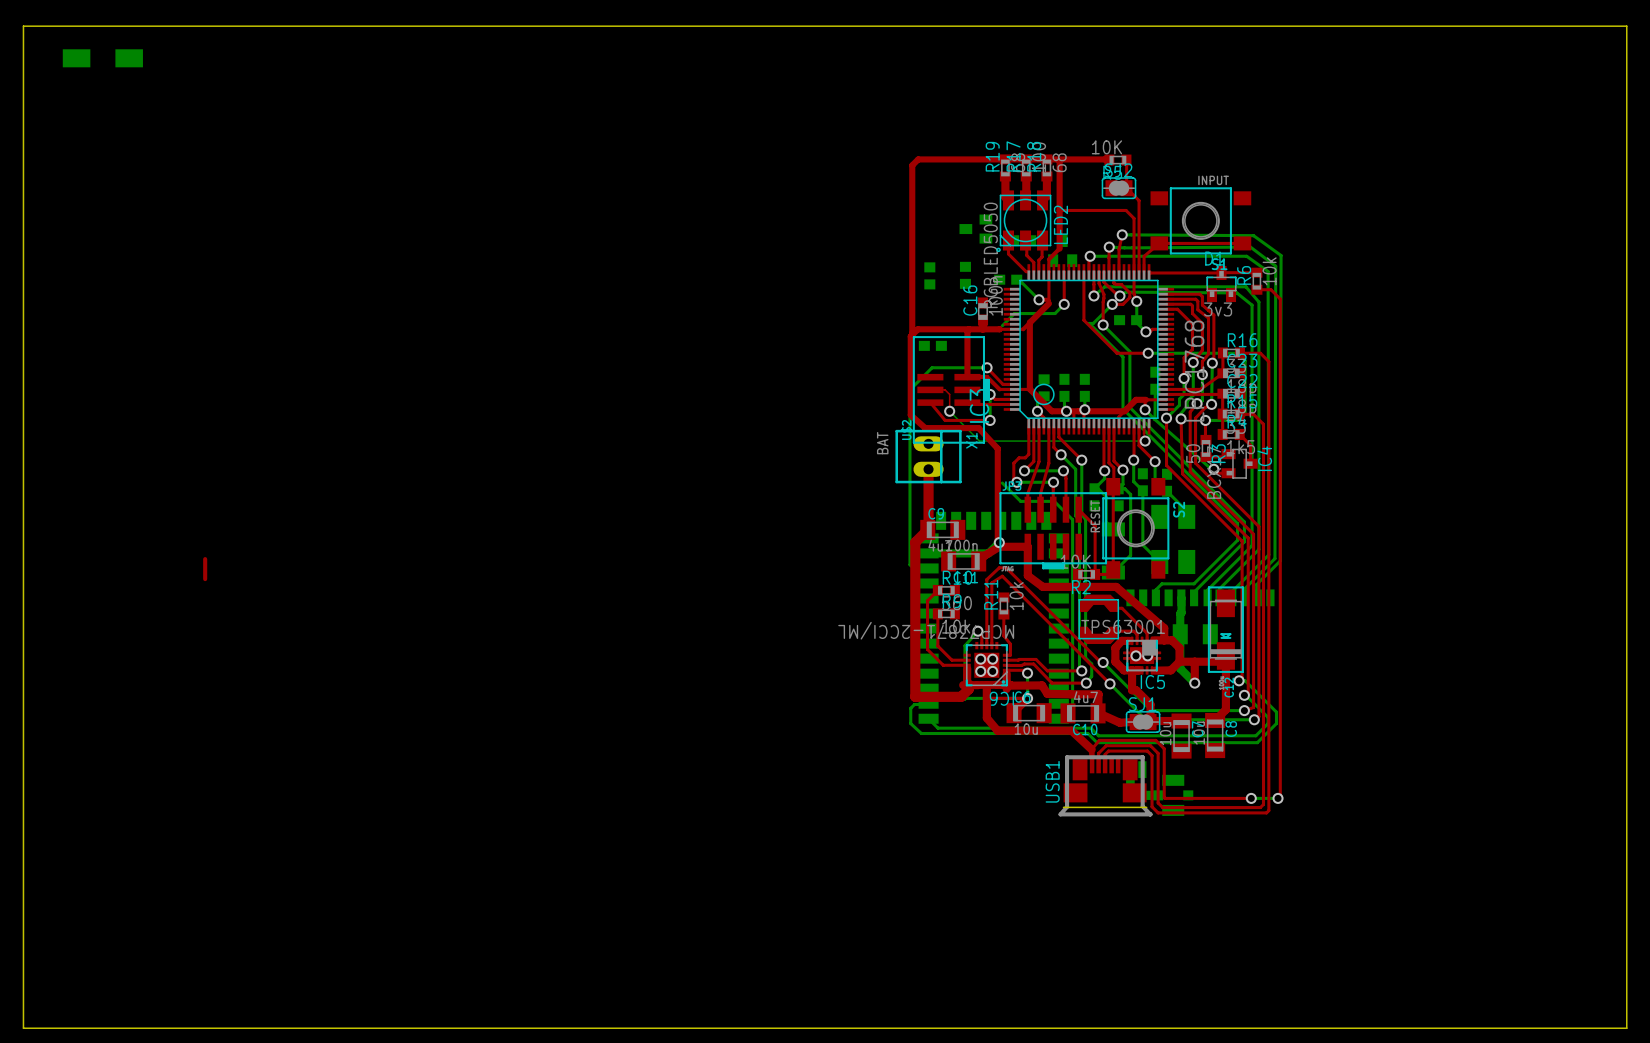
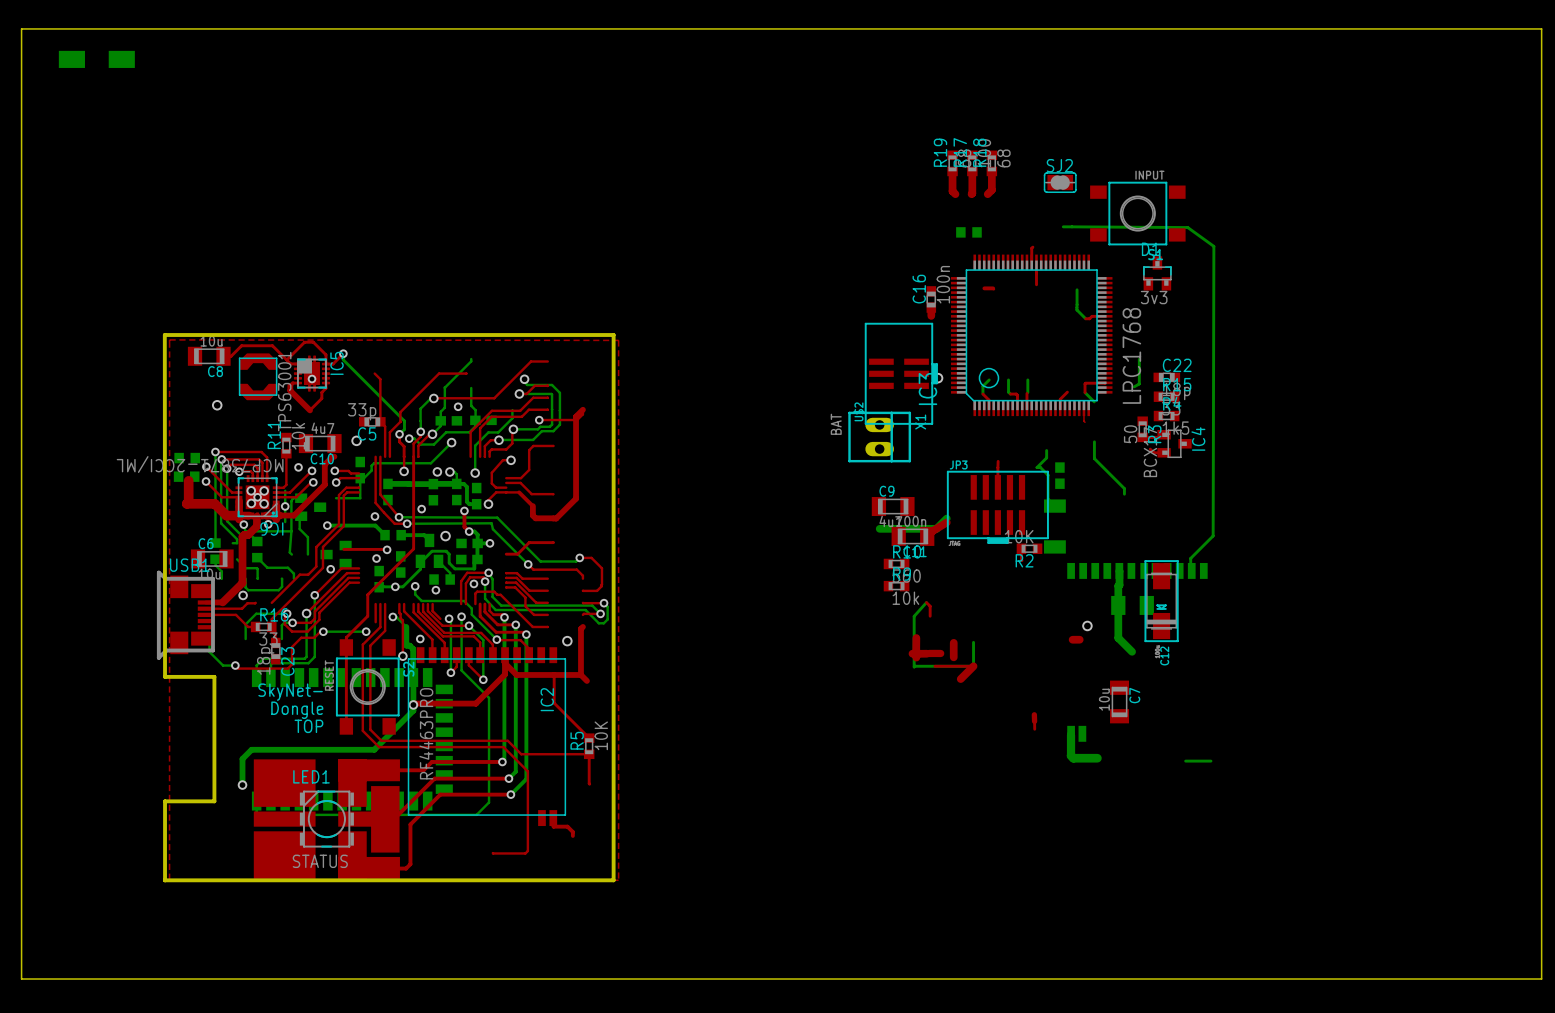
top track: (1059, 160) (1059, 248) (1048, 259) (1048, 271) -> none
top track: (1109, 160) (918, 159) (912, 165) (913, 334) -> none
R5 rotation: 0° (1117, 160) -> 90° clockwise (589, 746)
R5 position: (1117, 160) -> (589, 746)
top track: (1126, 160) (1126, 188) (1139, 200) (1139, 271) -> none
top track: (1059, 210) (1126, 210) (1134, 218) (1134, 294) (1136, 301) -> none
LED2: RGBLED5050 (1023, 221) -> none
part: (975, 229) -> none
top track: (1122, 234) (1119, 249) (1119, 271) -> none
via: (1122, 234) -> none
top track: (1008, 240) (1008, 253) (1026, 271) (1028, 271) -> none
top track: (1025, 240) (1026, 255) (1033, 262) (1033, 271) -> none
top track: (1042, 240) (1038, 271) -> none
top track: (1242, 243) (1159, 243) (1144, 256) (1144, 271) -> none
bottom track: (1109, 247) (1250, 247) (1275, 266) (1274, 558) (1244, 588) (1245, 597) -> none
top track: (1109, 247) (1108, 271) -> none
via: (1109, 247) -> none
part: (1062, 250) -> none
bottom track: (1090, 256) (1246, 256) (1268, 271) (1268, 554) (1232, 591) (1232, 597) -> none
via: (1090, 256) -> none
top track: (1048, 271) (1048, 303) (1029, 322) (1029, 389) -> none
top track: (1063, 271) (1064, 304) -> none
top track: (1083, 271) (1083, 320) (1116, 353) (1148, 353) -> none
top track: (1099, 271) (1099, 283) (1103, 294) (1103, 324) -> none
top track: (1103, 271) (1103, 282) (1119, 295) -> none
top track: (1113, 271) (1113, 282) (1121, 284) (1129, 292) (1129, 297) (1123, 304) (1112, 304) -> none
top track: (1149, 271) (1256, 272) -> none
part: (929, 275) -> none
part: (965, 275) -> none
part: (1008, 279) -> none
bottom track: (1016, 279) (1039, 299) -> none
R6: 10k (1256, 281) -> none
top track: (1256, 289) (1271, 289) (1280, 299) (1280, 796) (1278, 798) -> none
top track: (1166, 294) (1199, 294) (1202, 296) (1202, 305) (1213, 315) (1212, 363) -> none
bottom track: (1093, 295) (1104, 286) (1245, 286) (1258, 302) (1258, 549) (1219, 588) (1219, 597) -> none
via: (1093, 295) -> none
bottom track: (1119, 295) (1126, 292) (1236, 292) (1252, 305) (1252, 545) (1207, 590) (1207, 597) -> none
via: (1119, 295) -> none
via: (1039, 299) -> none
top track: (1166, 299) (1195, 299) (1197, 301) (1197, 309) (1208, 318) (1208, 354) (1202, 361) (1202, 374) -> none
via: (1136, 301) -> none
bottom track: (1064, 304) (1055, 313) (1014, 313) (1002, 325) -> none
via: (1064, 304) -> none
bottom track: (1112, 304) (1093, 323) (1089, 323) (1123, 357) (1123, 408) (1237, 523) (1237, 540) (1194, 583) (1161, 583) (1155, 589) (1155, 597) -> none
via: (1112, 304) -> none
top track: (1166, 304) (1190, 304) (1192, 313) (1202, 323) (1202, 350) (1193, 362) -> none
top track: (1166, 309) (1177, 309) (1192, 324) (1192, 349) (1184, 357) (1184, 378) -> none
part: (1128, 320) -> none
top track: (1030, 322) (1023, 329) (917, 329) (910, 336) (910, 415) (925, 428) (978, 428) (997, 448) (997, 541) (999, 546) (1027, 546) (1027, 575) (1042, 586) (1116, 586) (1164, 628) (1164, 640) -> none
bottom track: (1103, 324) (1129, 351) (1129, 407) (1244, 521) (1244, 541) (1194, 592) (1194, 597) -> none
via: (1103, 324) -> none
top track: (968, 329) (967, 377) (987, 376) (999, 389) (1029, 389) -> none
via: (1145, 331) -> none
part: (932, 345) -> none
top track: (1222, 352) (1222, 373) (1200, 389) (1166, 389) -> none
R16 position: (1231, 352) -> (263, 626)
top track: (1239, 352) (1260, 353) (1268, 361) (1268, 810) (1266, 812) (1158, 812) (1152, 806) (1152, 755) (1147, 751) (1108, 751) (1105, 754) (1105, 764) -> none
bottom track: (1148, 353) (1239, 353) (1245, 360) (1245, 414) (1239, 420) (1205, 420) -> none
via: (1148, 353) -> none
top zone outline: none -> (169, 339) (618, 340) (618, 880) (169, 879) (169, 339)
bottom track: (1193, 362) (1193, 395) (1187, 401) (1187, 405) (1181, 413) (1181, 418) -> none
via: (1193, 362) -> none
bottom track: (1212, 363) (1211, 404) -> none
via: (1212, 363) -> none
bottom track: (987, 367) (932, 367) (909, 389) (909, 564) (913, 568) (928, 568) -> none
top track: (987, 367) (1002, 384) (1011, 384) -> none
via: (987, 367) -> none
bottom track: none -> (343, 353) (343, 359) (404, 421) (404, 429) (399, 434)
top track: none -> (343, 353) (333, 364) (325, 364) (325, 354) (313, 342) (304, 342) (286, 360)
via: none -> (343, 353)
top track: none -> (223, 356) (231, 356) (241, 345) (272, 345) (290, 363) (297, 364)
C23 rotation: 0° (1231, 373) -> 90° clockwise (275, 651)
C23 position: (1231, 373) -> (275, 651)
bottom track: none -> (471, 359) (471, 361) (444, 387) (444, 407) (440, 411) (440, 426) (432, 434)
via: (1202, 374) -> none
top track: none -> (547, 361) (531, 361) (494, 398) (433, 398)
bottom track: (1184, 378) (1184, 394) (1179, 399) (1179, 405) (1166, 418) -> none
via: (1184, 378) -> none
part: (1155, 380) -> none
part: (1044, 387) -> none
part: (1064, 387) -> none
part: (1084, 387) -> none
top track: none -> (374, 373) (380, 379) (380, 421) (385, 426) (385, 456)
top track: none -> (466, 373) (439, 373) (400, 412) (400, 421) (389, 432) (389, 456)
top track: (930, 389) (945, 389) (949, 394) (949, 411) -> none
top track: (1029, 389) (1052, 411) (1124, 411) (1135, 399) (1145, 399) -> none
bottom track: (1155, 389) (1154, 419) (1213, 469) -> none
part: none -> (258, 376)
top track: (1222, 393) (1166, 394) -> none
top track: (1222, 393) (1222, 434) -> none
bottom track: (990, 394) (990, 420) -> none
top track: (990, 394) (995, 399) (1011, 399) -> none
via: none -> (312, 379)
bottom track: none -> (524, 379) (527, 384) (552, 384) (559, 392) (559, 424) (553, 431) (541, 431) (533, 439) (498, 440)
via: none -> (524, 379)
top track: none -> (297, 383) (293, 383) (290, 385) (290, 390) (310, 410)
top track: none -> (326, 383) (326, 388) (321, 392) (321, 398) (310, 410)
top track: none -> (547, 385) (534, 385) (526, 393) (519, 393)
top track: (930, 402) (945, 420) (990, 420) -> none
top track: (967, 402) (969, 404) (1011, 404) -> none
top track: (1197, 403) (1190, 412) (1190, 471) (1253, 534) (1253, 707) (1244, 710) -> none
via: (1197, 403) -> none
bottom track: none -> (471, 388) (471, 405) (475, 410) (475, 426) (469, 432) (446, 432) (433, 444) (420, 444) (414, 438) (409, 438)
top track: (1211, 404) (1205, 407) (1195, 418) (1195, 463) (1258, 526) (1258, 716) (1254, 719) -> none
via: (1211, 404) -> none
via: (1084, 409) -> none
via: (1145, 409) -> none
bottom track: none -> (519, 393) (551, 393) (552, 424) (549, 426) (540, 426) (537, 429) (513, 429)
via: none -> (519, 393)
bottom track: (949, 411) (979, 441) (1145, 441) -> none
via: (949, 411) -> none
via: (1037, 411) -> none
via: (1066, 411) -> none
top track: (1239, 414) (1253, 414) (1263, 424) (1263, 804) (1260, 807) (1162, 807) (1158, 802) (1158, 753) (1150, 745) (1106, 745) (1098, 753) (1098, 764) -> none
bottom track: none -> (433, 398) (430, 398) (420, 408) (420, 431)
via: none -> (433, 398)
top track: none -> (547, 397) (533, 397) (520, 410) (491, 410) (470, 432) (470, 456)
top track: (1166, 418) (1166, 465) (1242, 541) (1242, 677) (1239, 680) -> none
via: (1166, 418) -> none
top track: (1181, 418) (1182, 473) (1248, 538) (1248, 693) (1244, 695) -> none
via: (1181, 418) -> none
via: (990, 420) -> none
top track: (1205, 420) (1205, 439) -> none
via: (1205, 420) -> none
via: none -> (217, 405)
via: none -> (458, 406)
top track: none -> (547, 409) (528, 409) (521, 416) (491, 416) (480, 428) (480, 456)
top track: (1028, 427) (1028, 454) (1025, 457) (1019, 457) (1013, 463) (1013, 479) (1016, 482) -> none
top track: (1033, 427) (1033, 461) (1024, 470) -> none
top track: (1038, 427) (1039, 461) (1027, 493) (1027, 509) -> none
top track: (1048, 427) (1048, 463) (1040, 493) (1040, 518) (1040, 509) -> none
top track: (1053, 427) (1053, 447) (1061, 454) -> none
top track: (1058, 427) (1058, 437) (1081, 460) -> none
top track: (1103, 427) (1104, 470) -> none
top track: (1108, 427) (1108, 462) (1113, 467) (1113, 486) (1113, 569) (1108, 574) (1095, 574) (1095, 526) (1078, 509) -> none
top track: (1113, 427) (1113, 461) (1123, 470) -> none
top track: (1134, 427) (1133, 460) -> none
top track: (1139, 427) (1139, 445) (1155, 461) -> none
bottom track: none -> (512, 410) (512, 418) (498, 432) (488, 432) (475, 445) (475, 473)
top track: (1239, 434) (1250, 445) (1250, 463) -> none
part: none -> (483, 420)
top track: none -> (539, 420) (577, 420) (582, 414) (582, 409) (576, 416) (576, 498) (556, 518) (553, 518)
via: none -> (539, 420)
part: none -> (448, 420)
C5: none -> 33p (372, 421)
via: (1145, 441) -> none
top track: none -> (513, 429) (512, 443) (506, 449) (491, 449) (489, 456)
via: none -> (513, 429)
top track: none -> (420, 431) (420, 436) (413, 443) (413, 548) (367, 594) (367, 616) (346, 637) (346, 726)
via: none -> (420, 431)
top track: none -> (399, 434) (399, 441) (404, 446) (404, 471)
via: none -> (399, 434)
top track: none -> (432, 434) (429, 434) (418, 445) (418, 456)
via: none -> (432, 434)
bottom track: (1061, 454) (1075, 469) (1075, 515) (1079, 521) (1079, 670) (1081, 670) -> none
via: (1061, 454) -> none
via: none -> (409, 438)
top track: none -> (498, 440) (490, 440) (484, 446) (484, 456)
via: none -> (498, 440)
via: none -> (356, 440)
bottom track: (1081, 460) (1081, 514) (1085, 519) (1085, 657) (1091, 664) (1091, 676) (1086, 683) -> none
via: (1081, 460) -> none
bottom track: (1133, 460) (1133, 481) (1142, 490) (1142, 545) (1159, 561) -> none
via: (1133, 460) -> none
via: (1155, 461) -> none
bottom track: none -> (451, 442) (430, 463) (374, 463) (371, 465) (371, 470) (364, 478) (360, 478) (360, 498) (336, 498)
via: none -> (451, 442)
top track: none -> (553, 445) (533, 445) (529, 450) (529, 469) (520, 478) (506, 478)
top track: (928, 469) (928, 529) (915, 542) (915, 696) (961, 696) (968, 689) (968, 684) -> none
via: (1213, 469) -> none
bottom track: (1024, 470) (1063, 470) -> none
via: (1024, 470) -> none
top track: (1063, 470) (1065, 473) (1065, 509) -> none
via: (1063, 470) -> none
via: (1104, 470) -> none
bottom track: (1123, 470) (1123, 484) (1118, 488) (1124, 488) (1130, 494) (1130, 555) (1113, 572) -> none
via: (1123, 470) -> none
bottom track: none -> (215, 451) (215, 543)
top track: none -> (215, 451) (261, 451) (267, 457) (267, 478)
via: none -> (215, 451)
top track: none -> (286, 453) (286, 484) (283, 487) (276, 487)
top track: none -> (334, 456) (324, 464) (324, 484) (294, 515) (265, 515)
top track: none -> (375, 456) (375, 502) (394, 523) (407, 523)
top track: none -> (380, 456) (380, 494) (399, 517)
part: none -> (187, 458)
bottom track: none -> (221, 459) (221, 523) (237, 539) (237, 543) (232, 543)
top track: none -> (221, 459) (258, 459) (262, 462) (262, 478)
via: none -> (221, 459)
top track: none -> (511, 460) (502, 460) (491, 472) (491, 483) (496, 487) (506, 487)
via: none -> (511, 460)
bottom track: (1016, 482) (1053, 482) -> none
via: (1016, 482) -> none
via: (1053, 482) -> none
part: (1142, 482) -> none
part: (1167, 482) -> none
bottom track: (1002, 483) (1020, 501) (1054, 501) (1072, 519) (1072, 717) (1058, 718) -> none
top track: none -> (206, 466) (232, 492) (238, 492)
via: none -> (206, 466)
via: none -> (298, 467)
bottom track: none -> (227, 468) (227, 521) (240, 534) (250, 534) (257, 541)
top track: none -> (227, 468) (230, 464) (254, 464) (257, 468) (257, 478)
via: none -> (227, 468)
part: none -> (360, 470)
top track: none -> (312, 470) (289, 492) (276, 492)
via: none -> (312, 470)
top track: none -> (334, 470) (359, 473)
via: none -> (334, 470)
via: none -> (404, 471)
top track: none -> (239, 471) (250, 471) (252, 478)
via: none -> (239, 471)
via: none -> (437, 471)
bottom track: none -> (449, 471) (456, 474) (456, 483) (387, 483)
via: none -> (449, 471)
via: none -> (475, 473)
part: (1094, 497) -> none
part: none -> (186, 476)
top track: none -> (358, 478) (340, 478) (336, 482)
top track: none -> (188, 480) (188, 501) (186, 503) (214, 503) (226, 515) (249, 515)
top track: none -> (206, 481) (221, 497) (238, 497)
via: none -> (206, 481)
top track: none -> (313, 482) (296, 497) (276, 497)
via: none -> (313, 482)
via: none -> (336, 482)
top track: none -> (506, 482) (520, 482) (531, 494) (553, 494)
bottom track: none -> (456, 483) (463, 483) (466, 487) (466, 501) (469, 504) (476, 504)
top track: none -> (358, 487) (346, 487) (338, 495) (338, 524) (316, 547) (316, 566) (308, 574) (299, 574) (271, 602)
via: none -> (251, 490)
via: none -> (264, 490)
bottom track: none -> (285, 490) (285, 522)
part: none -> (387, 491)
part: none -> (433, 492)
part: none -> (456, 491)
top track: none -> (506, 492) (496, 492) (488, 500) (488, 504)
top track: none -> (359, 492) (347, 492) (343, 495) (343, 526) (322, 546) (322, 567) (271, 619) (271, 631) (275, 634) (275, 643)
top track: none -> (506, 492) (519, 492) (532, 506) (532, 515) (535, 518) (553, 518)
part: none -> (476, 496)
via: none -> (257, 497)
bottom track: none -> (301, 498) (292, 498) (291, 501) (291, 531)
top track: none -> (239, 500) (239, 519)
via: none -> (251, 503)
via: none -> (264, 503)
via: none -> (488, 504)
top track: none -> (276, 505) (276, 519)
S2 position: (1135, 528) -> (367, 686)
via: none -> (285, 506)
part: none -> (310, 507)
via: none -> (421, 509)
top track: none -> (464, 510) (464, 526) (469, 531)
via: none -> (464, 510)
top track: none -> (257, 515) (256, 526) (248, 534) (242, 536) (242, 583) (222, 602) (205, 602)
part: (1173, 539) -> none
bottom track: none -> (301, 516) (299, 529) (307, 537) (307, 554)
via: none -> (374, 516)
bottom track: none -> (399, 517) (497, 517) (540, 561) (576, 561) (579, 557)
via: none -> (399, 517)
via: (999, 542) -> none
bottom track: none -> (243, 524) (245, 531) (291, 531)
via: none -> (243, 524)
via: none -> (268, 524)
bottom track: none -> (407, 523) (491, 523) (492, 529) (528, 564)
via: none -> (407, 523)
bottom track: none -> (327, 525) (375, 525) (385, 535)
via: none -> (327, 525)
bottom track: none -> (291, 531) (289, 552) (291, 554)
bottom track: none -> (469, 531) (474, 531) (477, 534) (477, 543)
via: none -> (469, 531)
top track: (205, 559) (205, 579) -> none
part: none -> (393, 535)
bottom track: none -> (401, 535) (424, 535) (429, 540)
via: none -> (445, 536)
top track: none -> (553, 542) (529, 542) (517, 554) (506, 554)
part: none -> (469, 543)
bottom track: none -> (489, 543) (477, 543) (477, 559) (474, 562) (474, 568) (455, 568) (449, 563) (449, 554) (446, 551) (432, 551) (420, 561)
via: none -> (489, 543)
part: none -> (257, 549)
top track: none -> (343, 549) (386, 549)
via: none -> (387, 549)
part: none -> (215, 551)
part: none -> (429, 550)
part: none -> (336, 554)
bottom track: none -> (257, 557) (267, 567) (287, 567) (293, 573) (293, 578)
via: none -> (376, 558)
top track: none -> (579, 557) (591, 557) (601, 568) (601, 586) (597, 590) (582, 590)
via: none -> (579, 557)
bottom track: none -> (215, 559) (215, 565) (221, 571) (221, 578)
bottom track: none -> (237, 559) (245, 568) (256, 568) (257, 578)
part: none -> (469, 559)
bottom track: none -> (420, 561) (420, 569) (402, 586) (379, 587) (384, 586)
bottom track: none -> (438, 561) (450, 573) (450, 579)
part: none -> (400, 564)
top track: none -> (528, 564) (533, 569) (576, 569) (582, 575) (582, 578)
via: none -> (528, 564)
top track: (937, 590) (927, 600) (927, 649) (943, 665) (967, 665) -> none
top track: none -> (359, 568) (341, 568) (314, 595)
via: none -> (330, 569)
bottom track: none -> (488, 572) (492, 579) (492, 596) (501, 605) (592, 605) (600, 613)
top track: none -> (488, 572) (467, 572) (461, 581) (461, 604)
via: none -> (488, 572)
top track: (1099, 599) (1107, 599) (1115, 608) (1121, 608) (1147, 633) (1147, 640) -> none
top track: none -> (359, 573) (347, 573) (306, 613)
top track: none -> (506, 573) (516, 573) (522, 578) (547, 578)
top track: none -> (359, 577) (348, 577) (314, 611) (314, 618) (310, 622) (292, 622)
top track: none -> (506, 577) (516, 577) (529, 590) (547, 590)
R11 position: (1003, 605) -> (286, 445)
bottom track: none -> (245, 578) (245, 587) (248, 590) (278, 590) (282, 586) (281, 578)
part: none -> (379, 579)
part: none -> (442, 579)
bottom track: none -> (485, 581) (485, 598) (495, 610) (585, 610) (598, 623) (603, 623) (607, 619) (607, 606) (604, 603)
top track: none -> (485, 581) (483, 577) (470, 577) (465, 583) (465, 604)
via: none -> (485, 581)
top track: none -> (359, 582) (349, 582) (319, 612) (319, 619) (307, 631) (292, 631) (284, 624) (287, 613)
top track: none -> (506, 582) (516, 582) (536, 602) (547, 602)
via: none -> (473, 583)
top track: (937, 613) (937, 646) (951, 660) (967, 660) -> none
via: none -> (395, 586)
bottom track: none -> (415, 586) (415, 594) (421, 600) (464, 600) (471, 608) (471, 614) (496, 639)
via: none -> (415, 586)
top track: (1003, 614) (1003, 635) (1010, 644) (1010, 655) (1006, 655) -> none
top track: none -> (506, 587) (515, 587) (525, 597) (525, 606) (534, 614) (547, 614)
part: (993, 617) -> none
via: none -> (435, 590)
part: (1098, 619) -> none
via: none -> (243, 595)
bottom track: none -> (314, 595) (314, 656) (308, 663) (271, 663) (270, 677)
via: none -> (314, 595)
top track: none -> (255, 602) (247, 603) (242, 608) (205, 608)
top track: none -> (582, 602) (604, 603)
via: none -> (604, 603)
via: (977, 631) -> none
top track: none -> (375, 604) (375, 622)
top track: none -> (380, 604) (380, 627) (362, 644) (362, 730) (379, 747) (503, 747) (527, 771) (527, 851) (525, 853) (492, 853)
top track: none -> (385, 604) (385, 630) (370, 645) (370, 729) (381, 740) (507, 740) (521, 754) (589, 754)
top track: none -> (399, 604) (399, 612) (402, 620) (402, 656)
top track: none -> (404, 604) (404, 611) (432, 639) (432, 655)
top track: none -> (413, 604) (413, 612) (444, 642) (444, 655)
top track: none -> (418, 604) (418, 611) (443, 636) (473, 636) (480, 642) (480, 655)
top track: none -> (423, 604) (423, 611) (444, 632) (481, 632) (492, 644) (492, 655)
top track: none -> (427, 604) (427, 611) (442, 625) (469, 625)
top track: none -> (432, 604) (432, 611) (440, 618)
top track: none -> (475, 604) (475, 593) (477, 591) (494, 591) (500, 594) (532, 626) (547, 626)
top track: none -> (480, 604) (480, 616) (496, 632) (524, 632) (526, 634)
top track: none -> (484, 604) (484, 611) (497, 624) (515, 624)
top track: none -> (489, 604) (489, 610) (493, 614) (501, 614) (504, 617)
top track: (1099, 638) (1107, 638) (1115, 631) (1133, 631) (1137, 634) (1137, 640) -> none
top track: (1132, 640) (1121, 640) (1115, 647) (1115, 661) (1124, 670) (1132, 670) (1132, 690) (1136, 690) (1150, 704) (1150, 721) (1181, 721) -> none
top track: (1152, 640) (1171, 640) (1179, 647) (1179, 661) -> none
bottom track: none -> (287, 613) (256, 613) (245, 624) (245, 639)
via: none -> (287, 613)
bottom track: none -> (306, 613) (306, 656) (304, 658) (263, 658) (256, 665) (256, 677)
via: none -> (306, 613)
top track: none -> (600, 613) (582, 614)
via: none -> (600, 613)
top track: none -> (205, 614) (236, 614) (248, 627) (255, 627)
top track: (986, 645) (986, 579) (999, 567) (1006, 567) (1101, 663) (1103, 662) -> none
top track: (991, 645) (991, 582) (1002, 576) (1110, 683) -> none
bottom track: none -> (392, 616) (396, 616) (406, 626) (406, 645) (409, 645) (413, 649) (413, 710) (374, 749)
via: none -> (392, 616)
bottom track: none -> (461, 616) (461, 670) (489, 697) (489, 802) (476, 814) (259, 814) (256, 812) (256, 801)
via: none -> (461, 616)
bottom track: none -> (504, 617) (504, 760) (502, 761)
via: none -> (504, 617)
bottom track: none -> (449, 618) (450, 620) (450, 672)
via: none -> (449, 618)
bottom track: none -> (292, 622) (284, 622) (281, 625) (281, 639)
via: none -> (292, 622)
bottom track: none -> (515, 624) (515, 771) (508, 778)
via: none -> (515, 624)
bottom track: none -> (469, 625) (483, 640) (483, 679)
via: none -> (469, 625)
via: (1135, 655) -> none
IC5 rotation: 0° (1142, 655) -> 90° counterclockwise (311, 373)
IC5 position: (1142, 655) -> (311, 373)
top track: none -> (582, 626) (580, 628) (580, 674)
via: (980, 659) -> none
via: (992, 659) -> none
top track: (1006, 660) (1035, 659) (1047, 670) (1081, 670) -> none
bottom track: none -> (323, 631) (366, 631)
top track: none -> (323, 631) (320, 631) (314, 637) (301, 637) (292, 647) (292, 664) (287, 668) (238, 668) (235, 665)
via: none -> (323, 631)
via: none -> (366, 631)
top track: (1179, 661) (1170, 670) (1152, 670) -> none
top track: (1179, 661) (1220, 661) (1225, 655) (1225, 709) (1215, 720) -> none
top track: (1194, 661) (1194, 683) -> none
bottom track: (1103, 662) (1151, 710) (1244, 710) -> none
via: (1103, 662) -> none
bottom track: none -> (526, 634) (526, 779) (510, 794)
via: none -> (526, 634)
IC6 position: (986, 665) -> (257, 497)
top track: (1006, 665) (1033, 664) (1052, 683) (1086, 683) -> none
bottom track: none -> (209, 639) (209, 651) (223, 665) (235, 665)
via: none -> (420, 638)
top track: none -> (496, 639) (520, 640) (529, 648) (529, 655)
via: none -> (496, 639)
top track: (1006, 670) (1024, 670) (1027, 673) -> none
via: (1081, 670) -> none
via: none -> (567, 641)
via: (980, 671) -> none
via: (992, 671) -> none
top track: (1006, 673) (1006, 675) (1006, 684) (995, 684) (1042, 685) (1047, 693) (1098, 694) (1098, 713) (1119, 722) (1135, 722) -> none
via: (1027, 673) -> none
bottom track: (1239, 680) (1245, 680) (1276, 712) (1276, 723) (1257, 742) (1097, 742) (1087, 733) (921, 733) (910, 723) (910, 708) (914, 704) (928, 703) -> none
via: (1239, 680) -> none
via: (1086, 683) -> none
bottom track: (1110, 683) (1145, 719) (1254, 719) -> none
via: (1110, 683) -> none
via: (1194, 683) -> none
top track: (986, 684) (986, 717) (997, 730) (1071, 730) (1091, 749) (1099, 740) (1155, 740) (1164, 748) (1165, 798) (1251, 798) -> none
top track: none -> (456, 655) (456, 666) (450, 672)
top track: none -> (468, 655) (468, 665) (483, 679)
via: none -> (402, 656)
top track: none -> (505, 656) (505, 674) (475, 703) (413, 704)
top track: none -> (505, 663) (516, 674) (580, 674)
bottom track: (1244, 695) (1268, 717) (1268, 723) (1255, 735) (1098, 735) (1090, 728) (938, 728) (928, 718) -> none
via: (1244, 695) -> none
via: none -> (235, 665)
via: (1027, 698) -> none
via: none -> (450, 672)
top track: none -> (554, 674) (554, 703) (589, 738)
top track: none -> (580, 674) (586, 680)
via: (1244, 710) -> none
via: none -> (483, 679)
C6 position: (1029, 713) -> (212, 558)
C10 position: (1083, 713) -> (320, 443)
via: (1254, 719) -> none
SJ1: (1143, 722) -> none
text: none -> SkyNet- (290, 692)
C8 rotation: 0° (1215, 735) -> 90° clockwise (209, 356)
C8 position: (1215, 735) -> (209, 356)
via: none -> (413, 704)
text: none -> Dongle (297, 710)
text: none -> TOP (308, 726)
IC2: none -> RF4463PRO (486, 736)
part: none -> (352, 739)
USB1 rotation: 0° (1105, 785) -> 90° clockwise (185, 615)
USB1 position: (1105, 785) -> (185, 615)
bottom track: none -> (374, 749) (251, 749) (242, 758) (242, 785)
top track: none -> (589, 754) (589, 784)
part: (1173, 795) -> none
via: (1251, 798) -> none
via: (1278, 798) -> none
top track: none -> (502, 761) (431, 761) (423, 770) (365, 770) (352, 783)
via: none -> (502, 761)
top track: none -> (508, 778) (434, 778) (390, 822) (385, 819) (361, 819)
via: none -> (508, 778)
via: none -> (242, 785)
top track: none -> (510, 794) (440, 794) (410, 824) (410, 864) (406, 868) (369, 867) (356, 855) (352, 855)
via: none -> (510, 794)
top track: none -> (553, 818) (553, 826) (567, 826) (572, 832) (572, 835)
LED1: none -> STATUS (326, 819)
board edge: none -> (164, 880) (613, 880) (613, 335) (164, 335) (165, 676) (214, 676) (214, 801) (165, 801) (165, 880)

